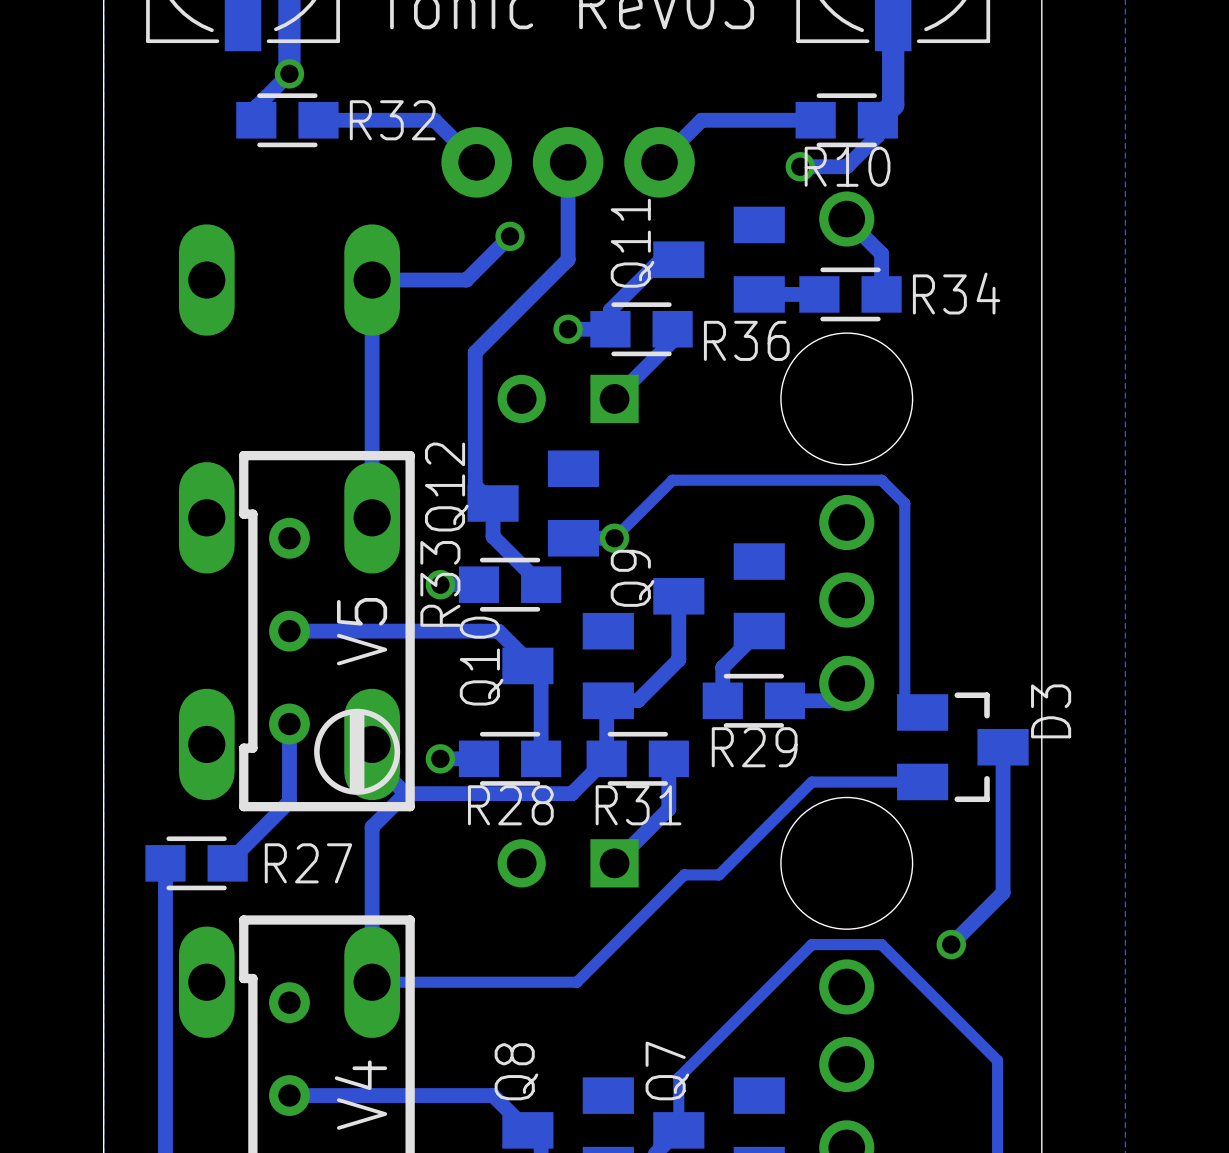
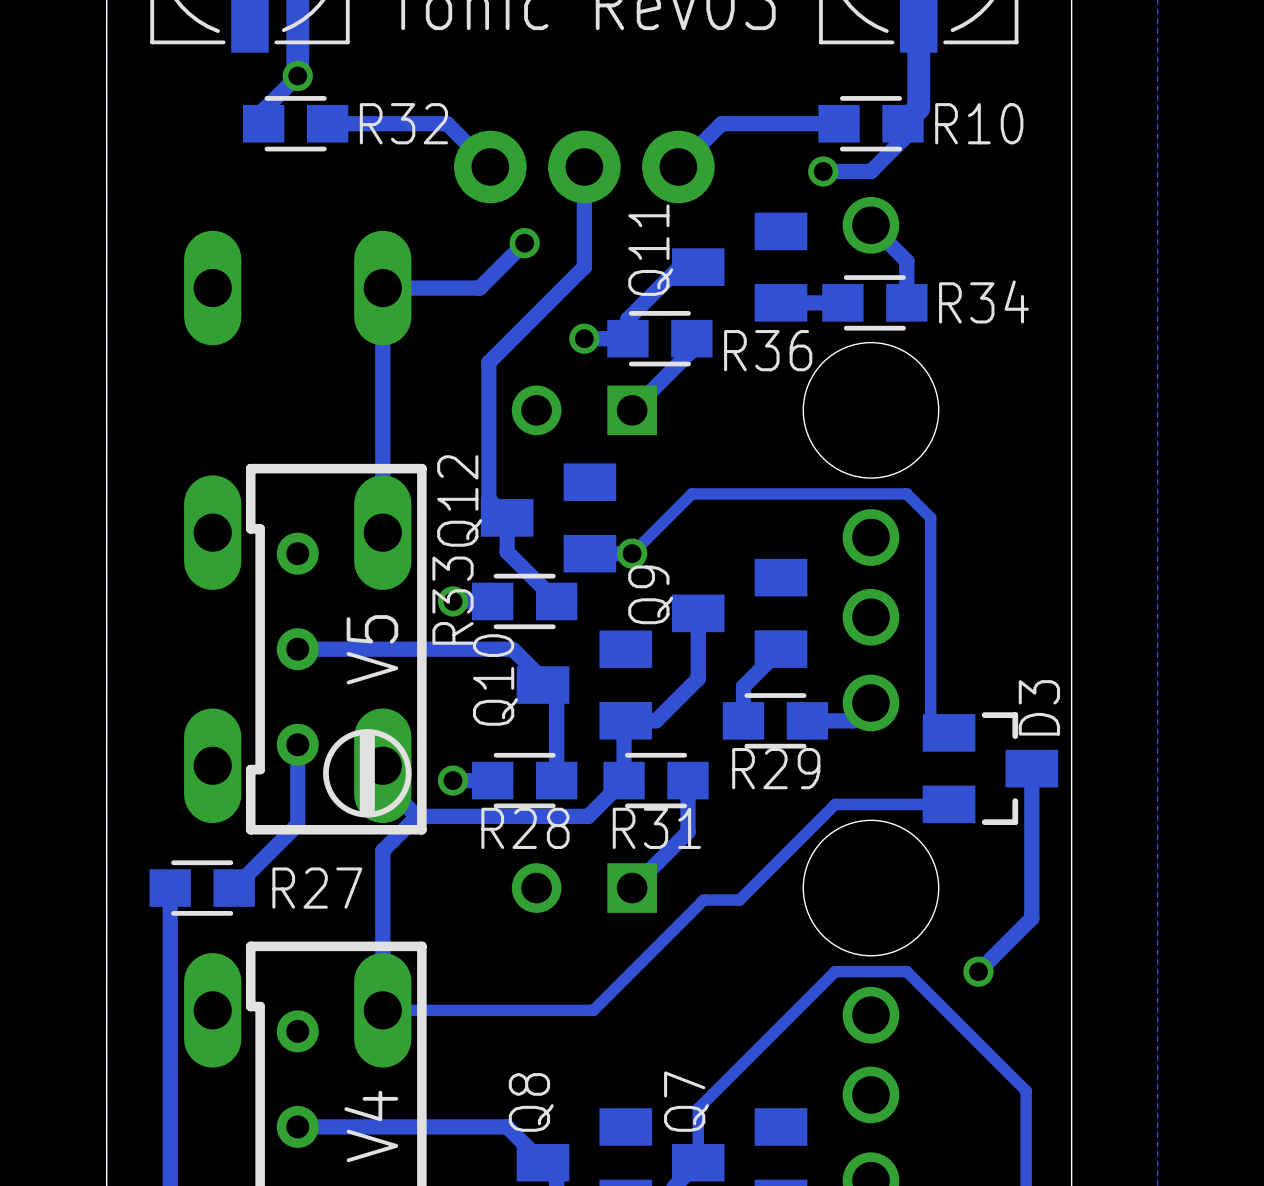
R10 name position: R10 (847, 166) -> R10 (979, 123)
D3 name position: D3 (1051, 711) -> D3 (1039, 707)

